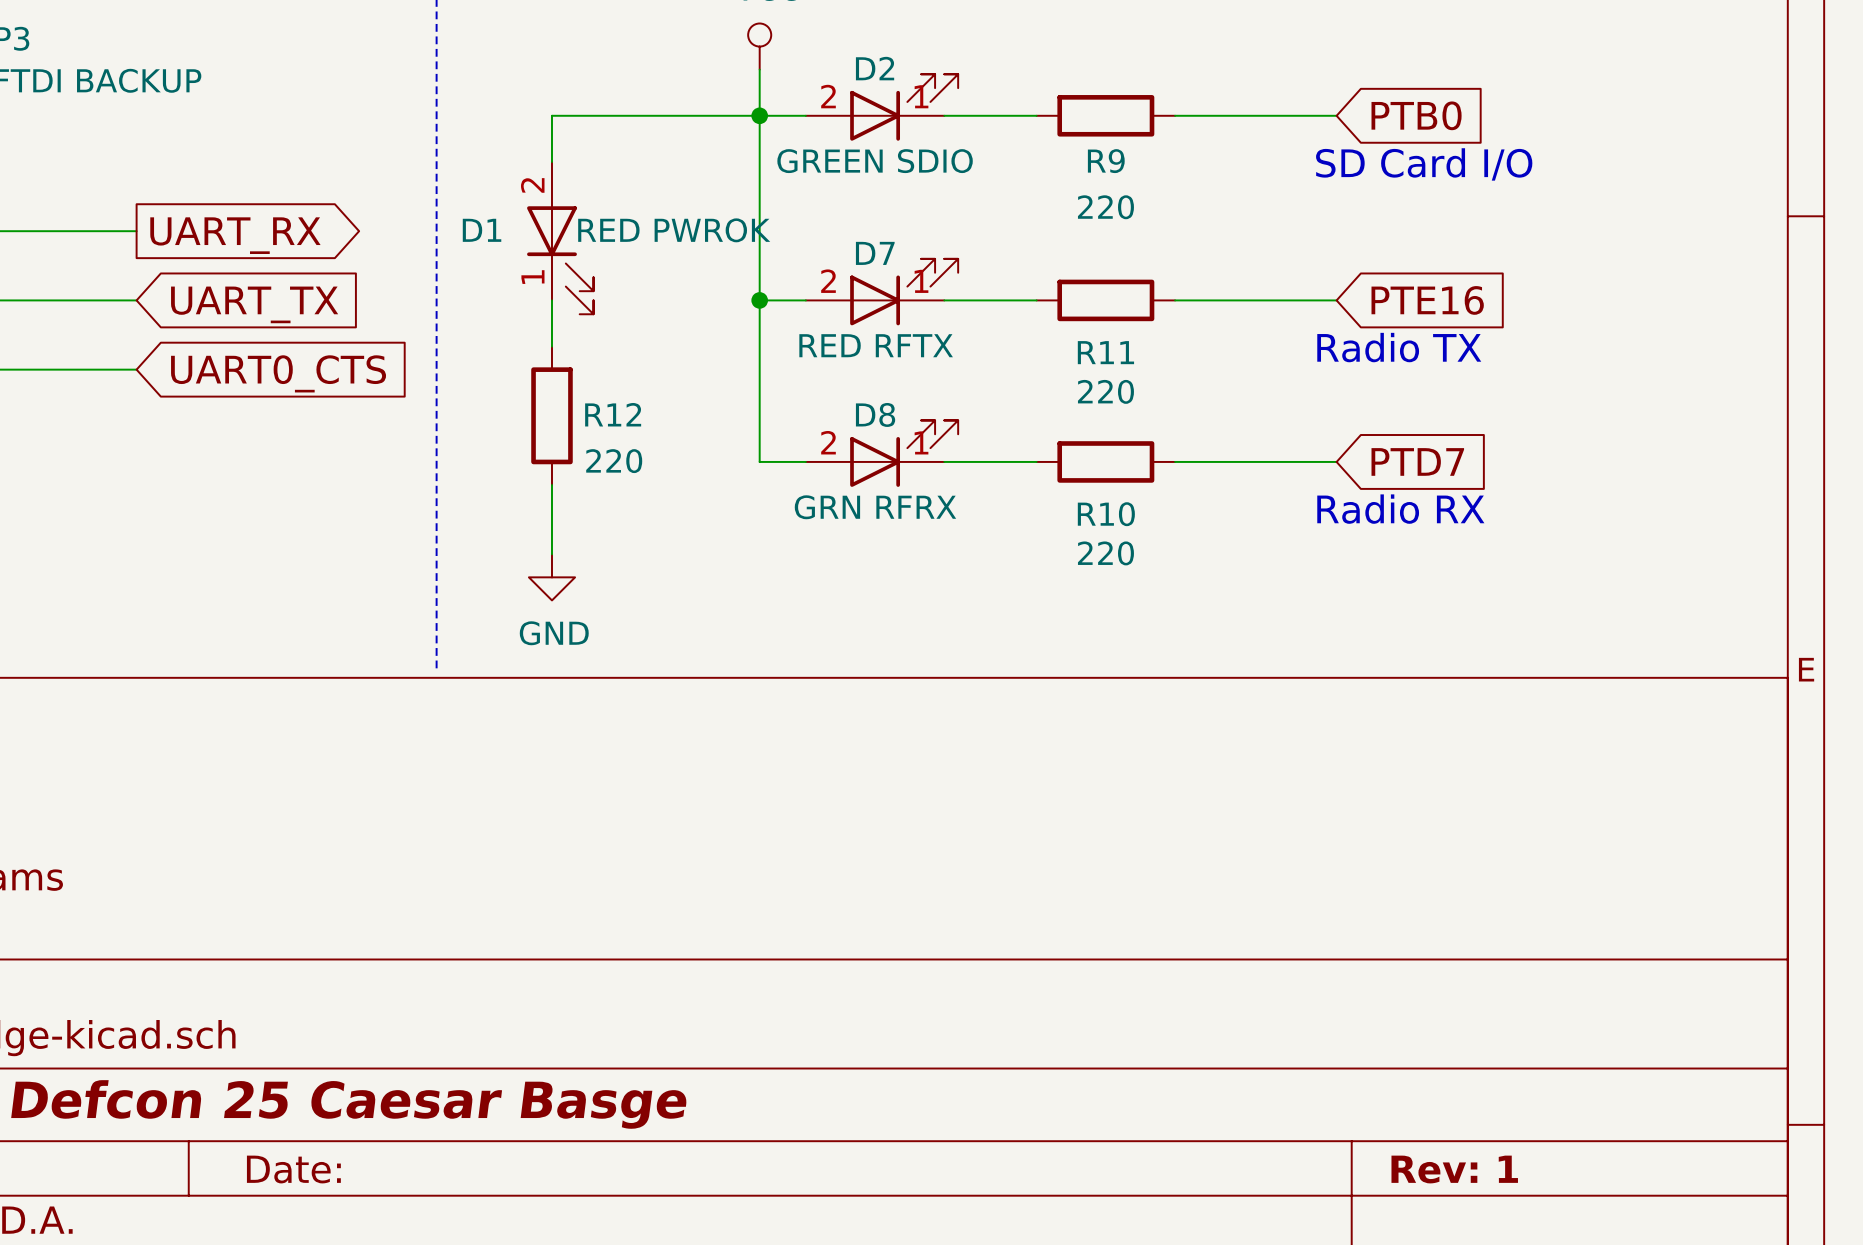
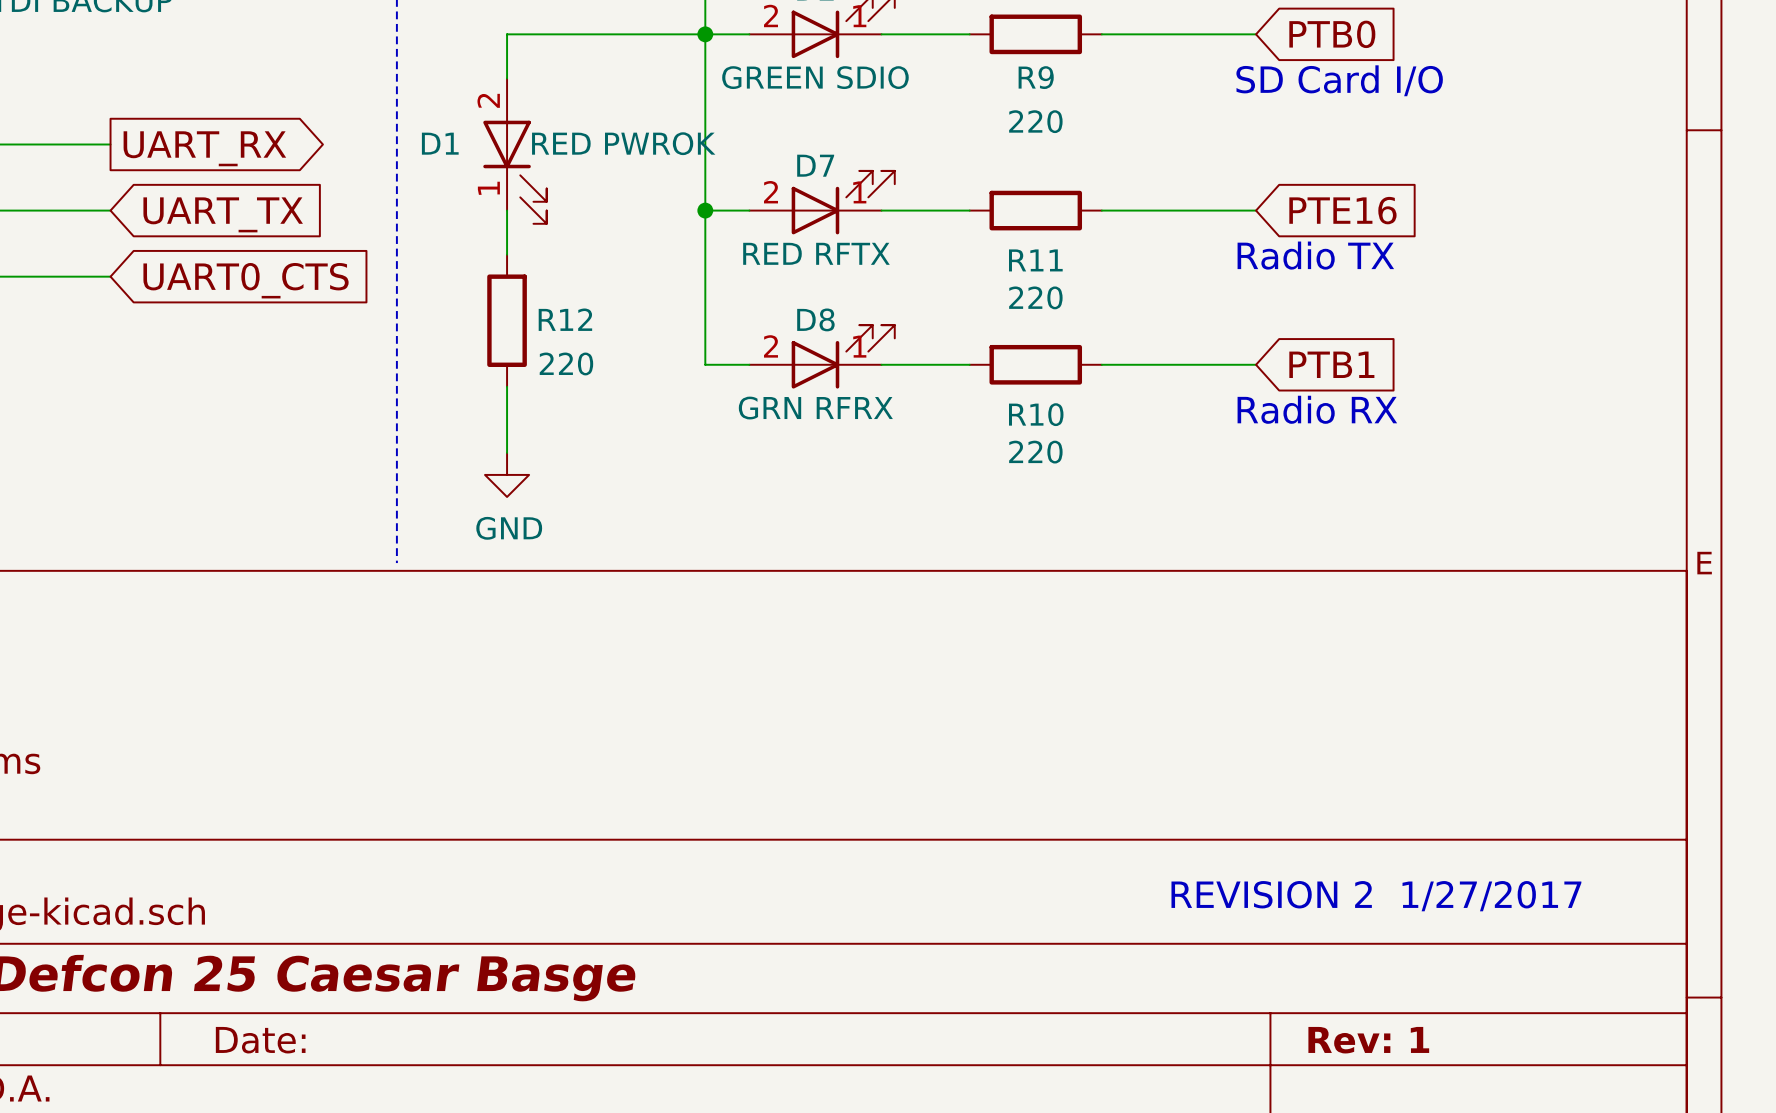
global label: PTD7 (1417, 461) -> PTB1 (1331, 364)
text: none -> REVISION 2 1/27/2017 (1376, 896)

